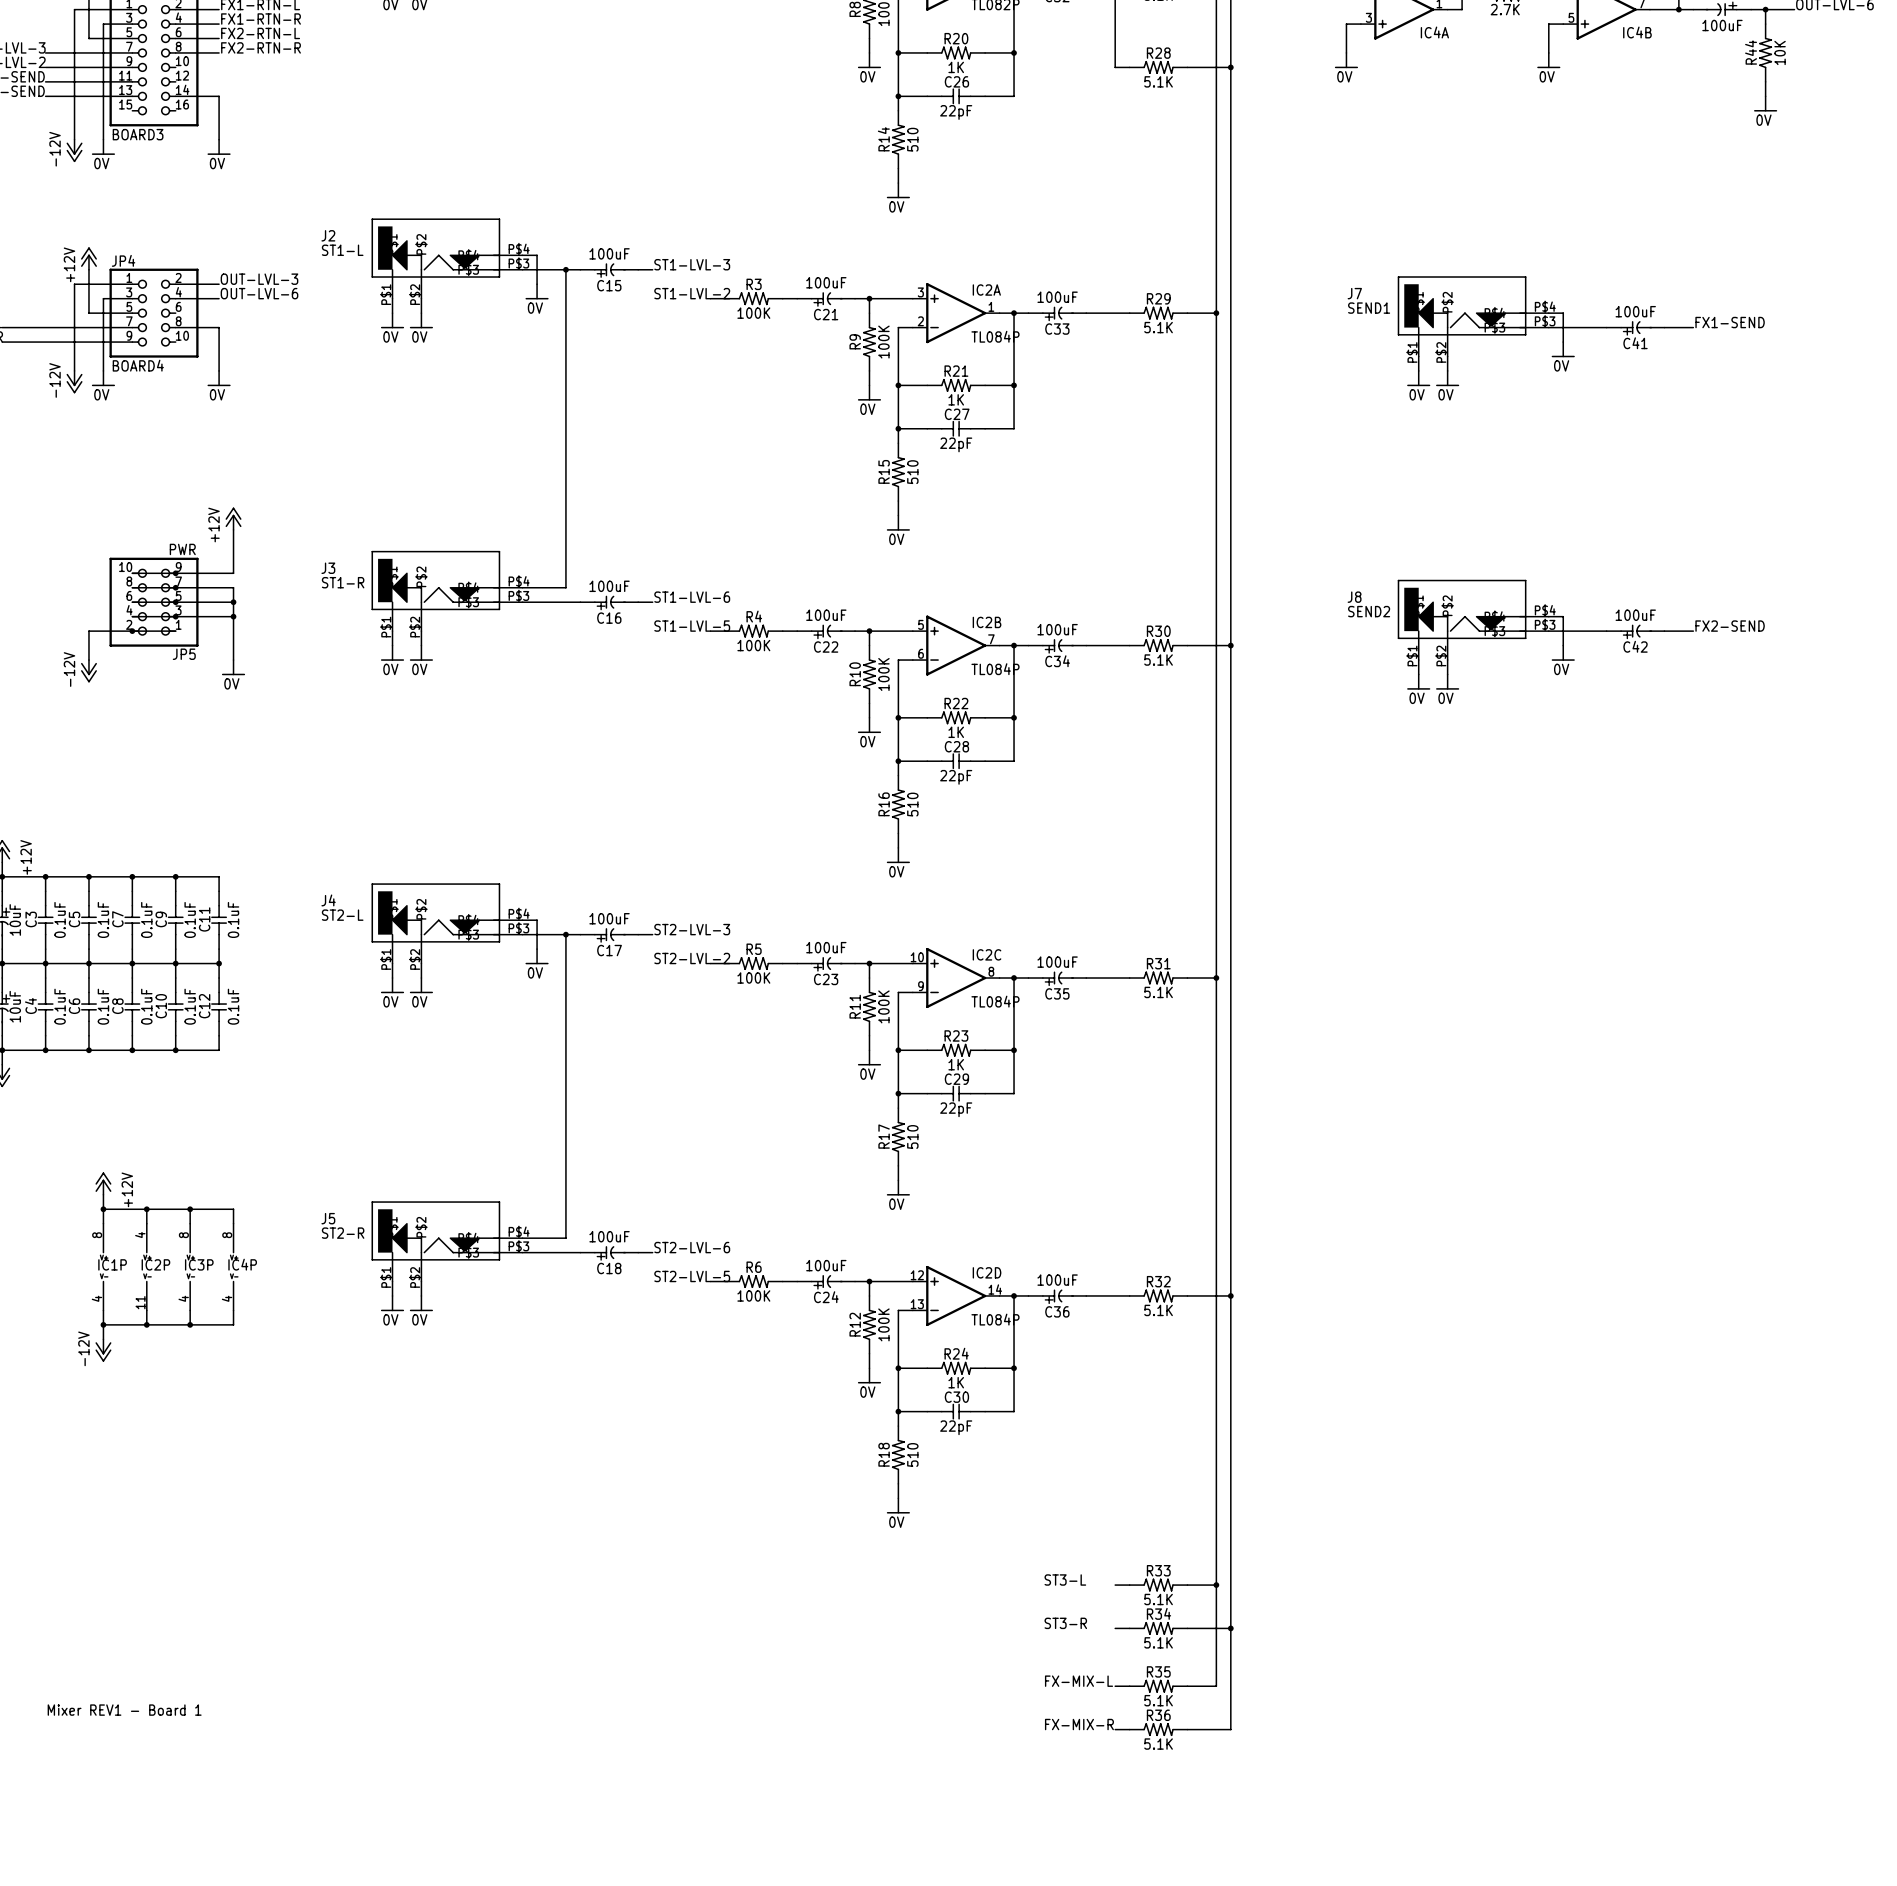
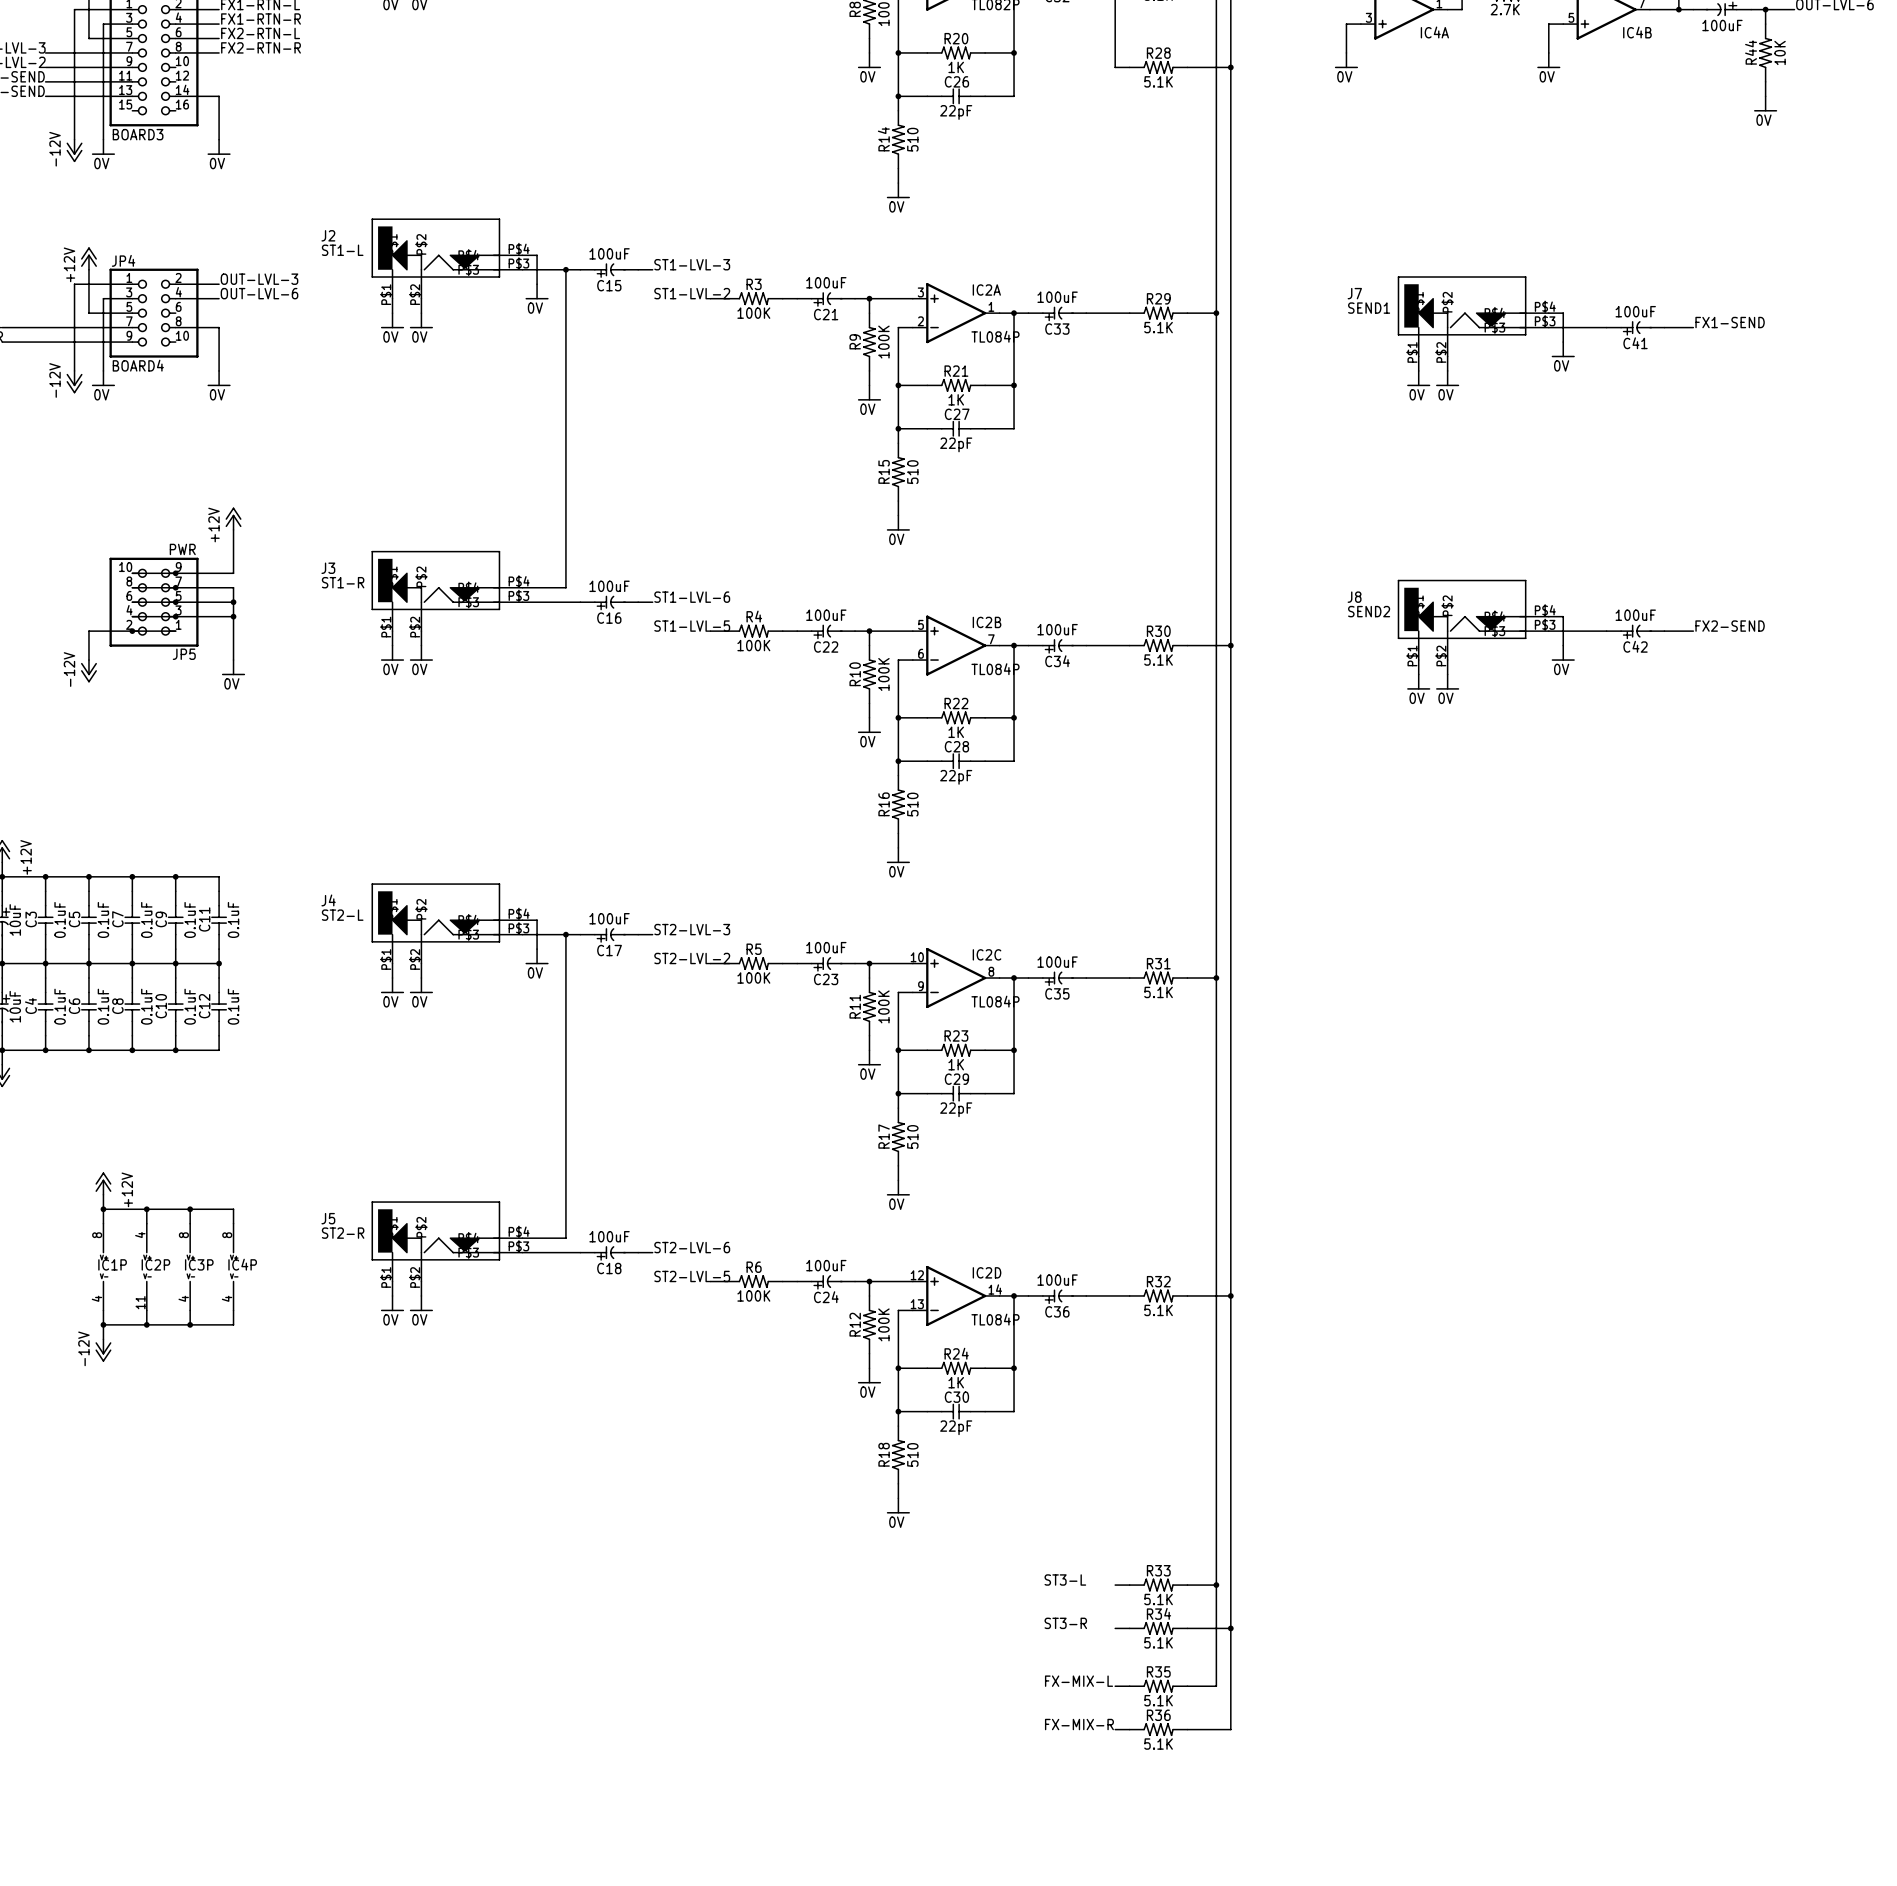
text: Mixer REV1 - Board 1 (124, 1710) -> none

